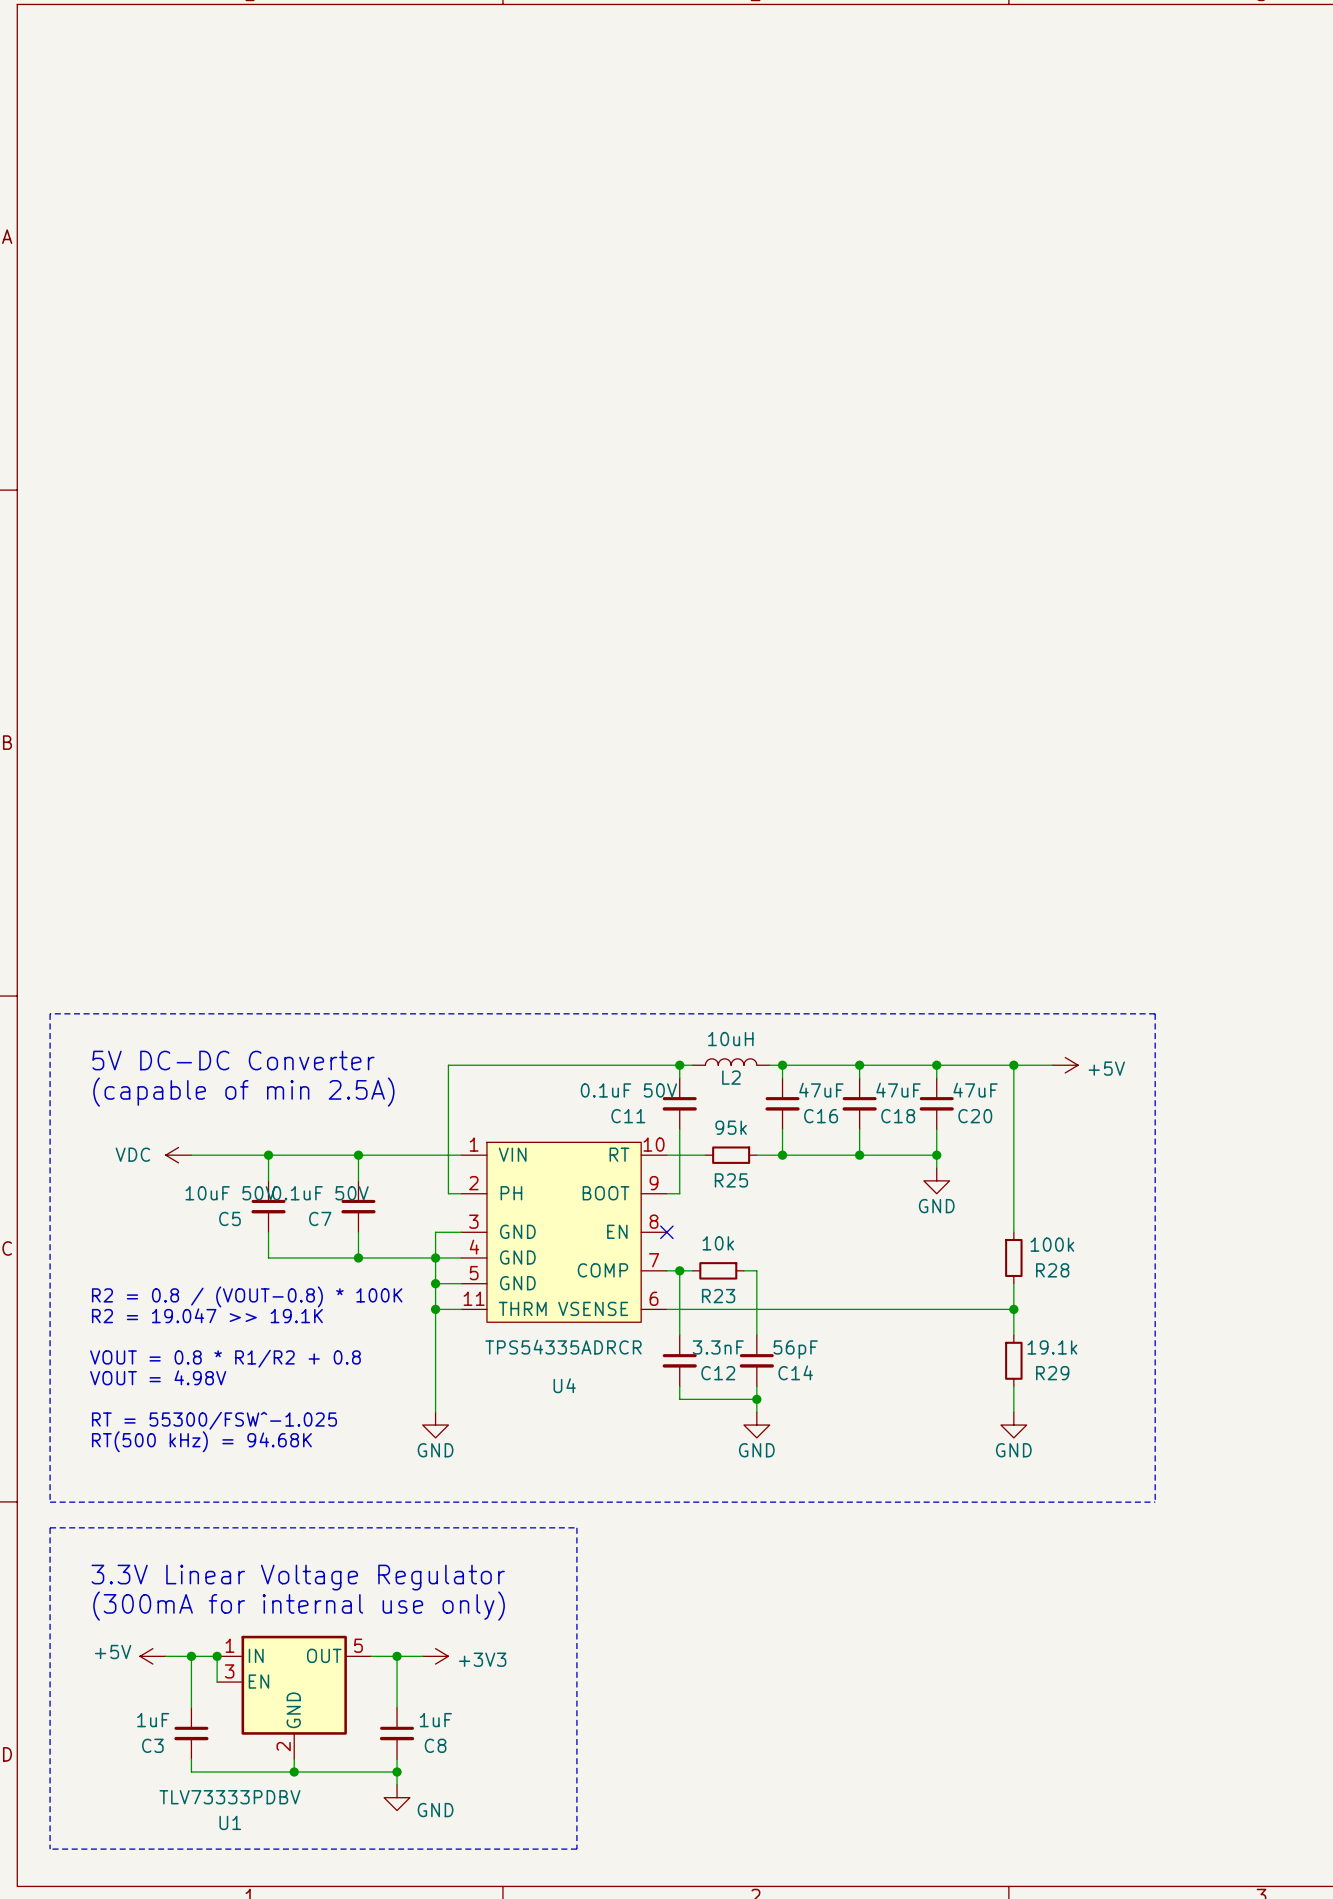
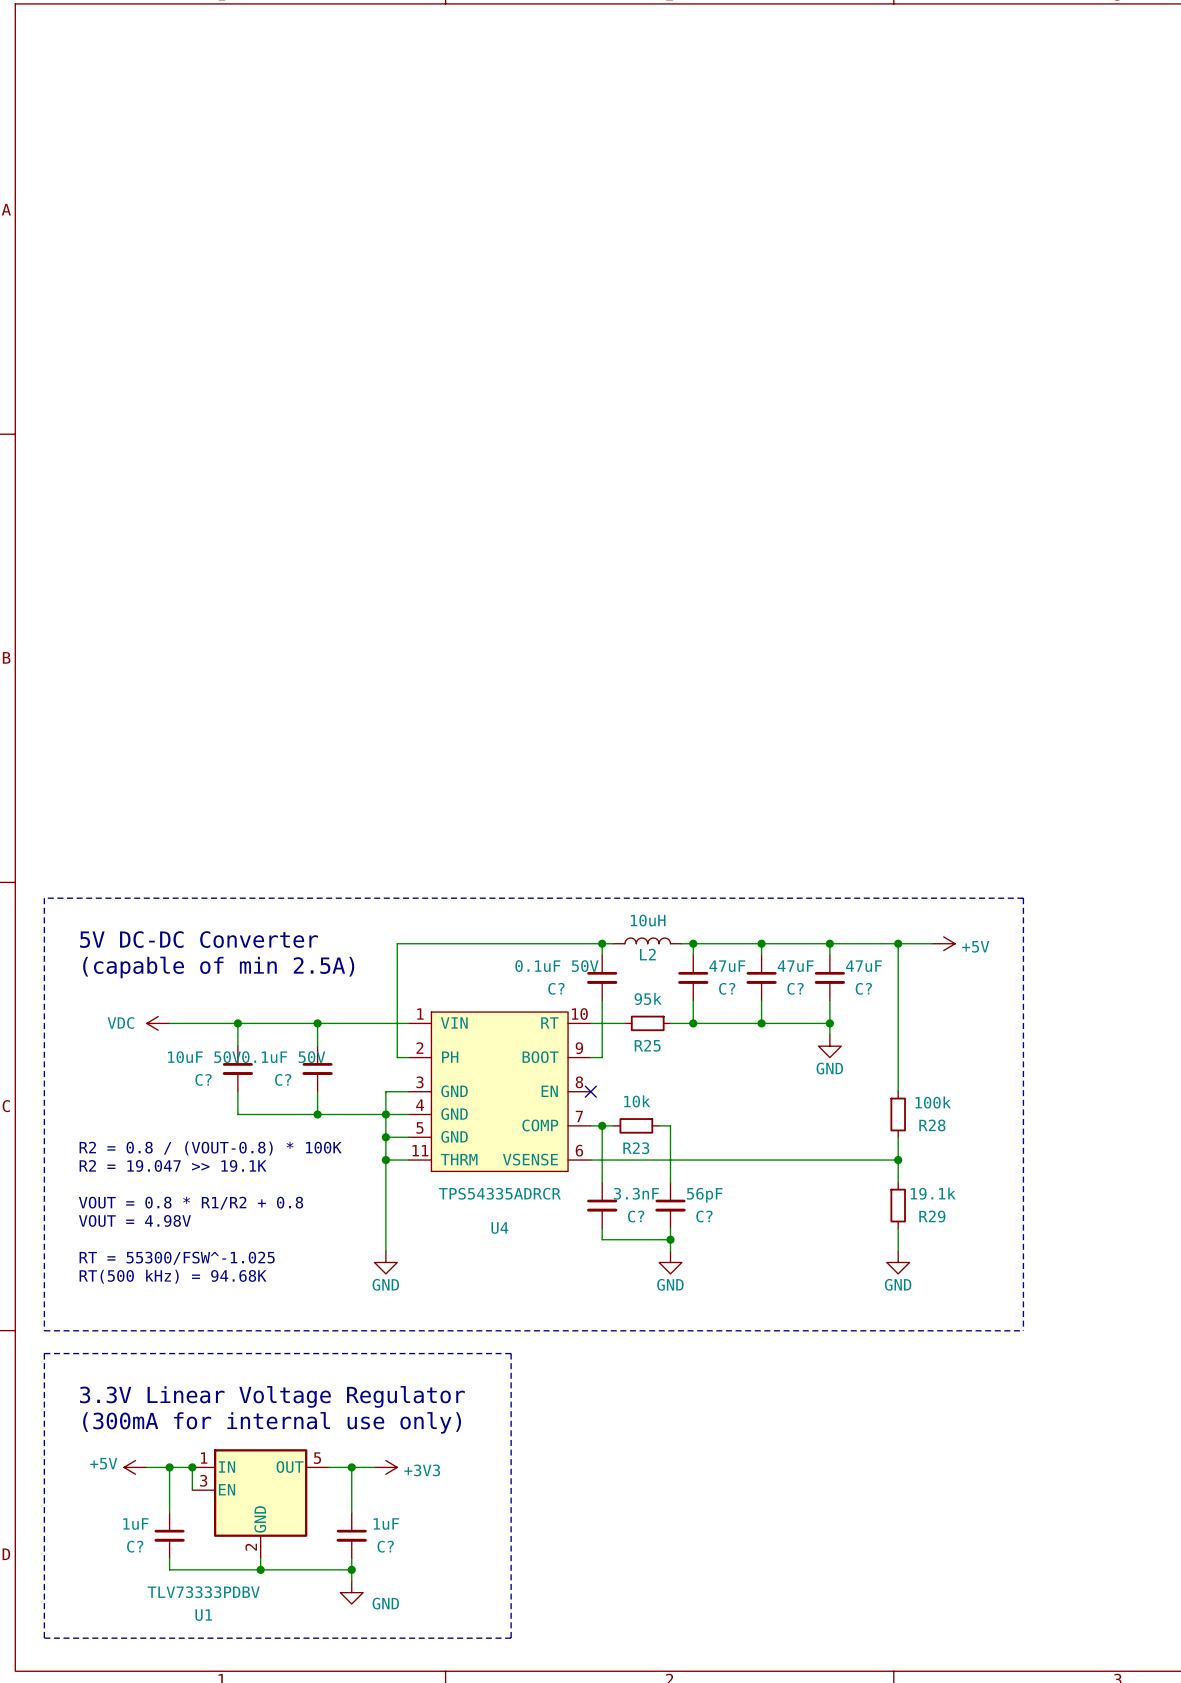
C11 name: C11 (628, 1116) -> C? (556, 988)
C16 name: C16 (821, 1116) -> C? (727, 988)
C18 name: C18 (898, 1116) -> C? (795, 988)
C20 name: C20 (975, 1116) -> C? (863, 988)
C5 name: C5 (229, 1218) -> C? (203, 1079)
C7 name: C7 (320, 1218) -> C? (283, 1079)
C14 name: C14 (795, 1372) -> C? (704, 1216)
C12 name: C12 (718, 1373) -> C? (636, 1216)
C3 name: C3 (152, 1745) -> C? (135, 1546)
C8 name: C8 (435, 1745) -> C? (385, 1546)

